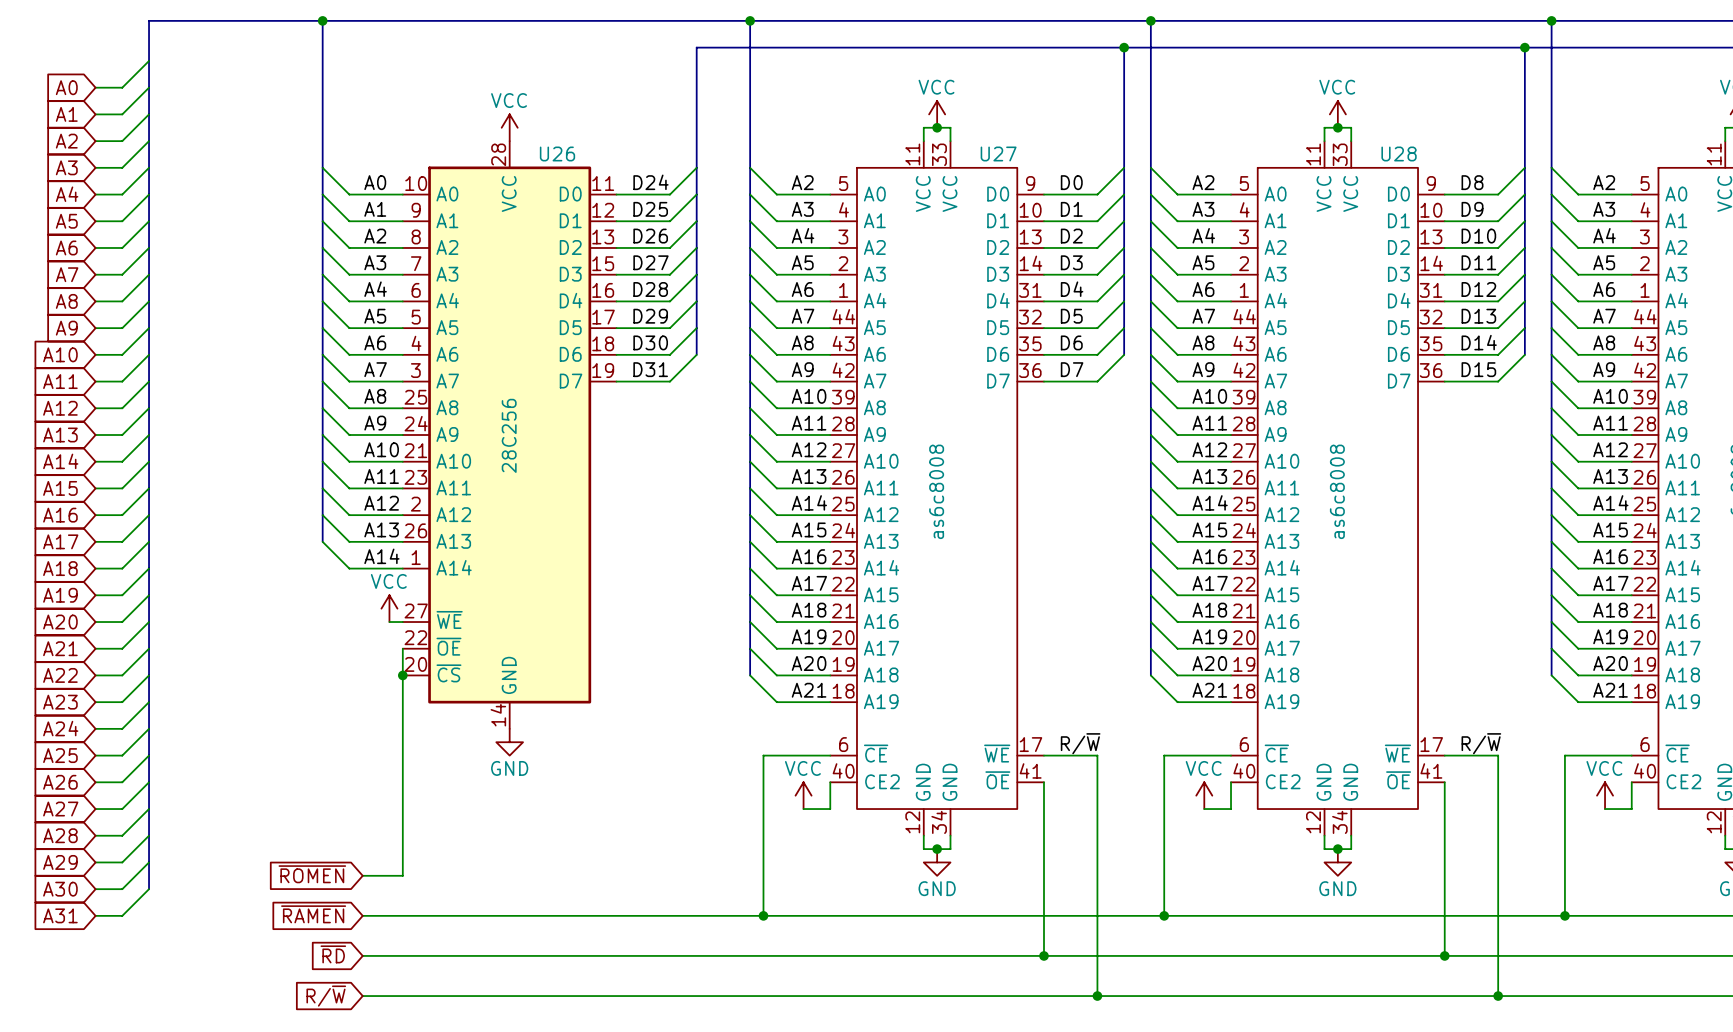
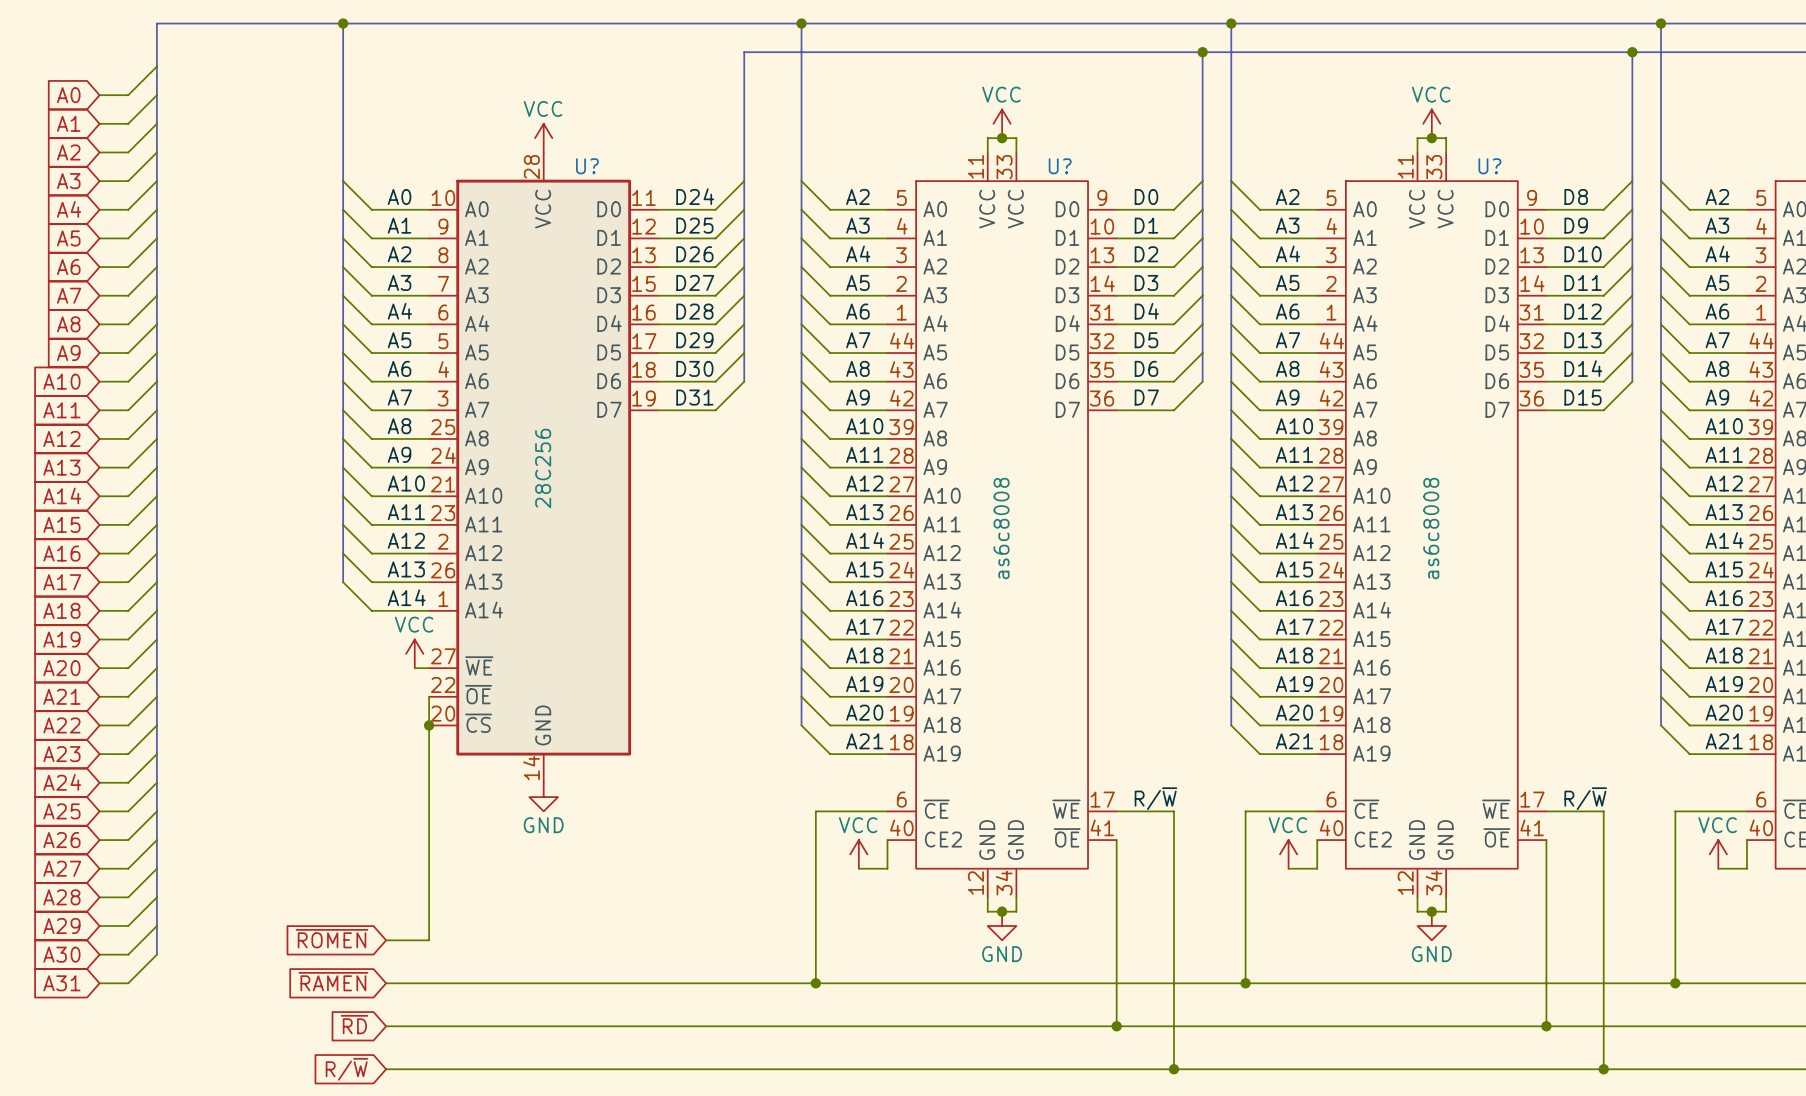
U26 name: U26 (557, 153) -> U? (587, 166)
U27 name: U27 (998, 153) -> U? (1060, 166)
U28 name: U28 (1399, 153) -> U? (1489, 166)

